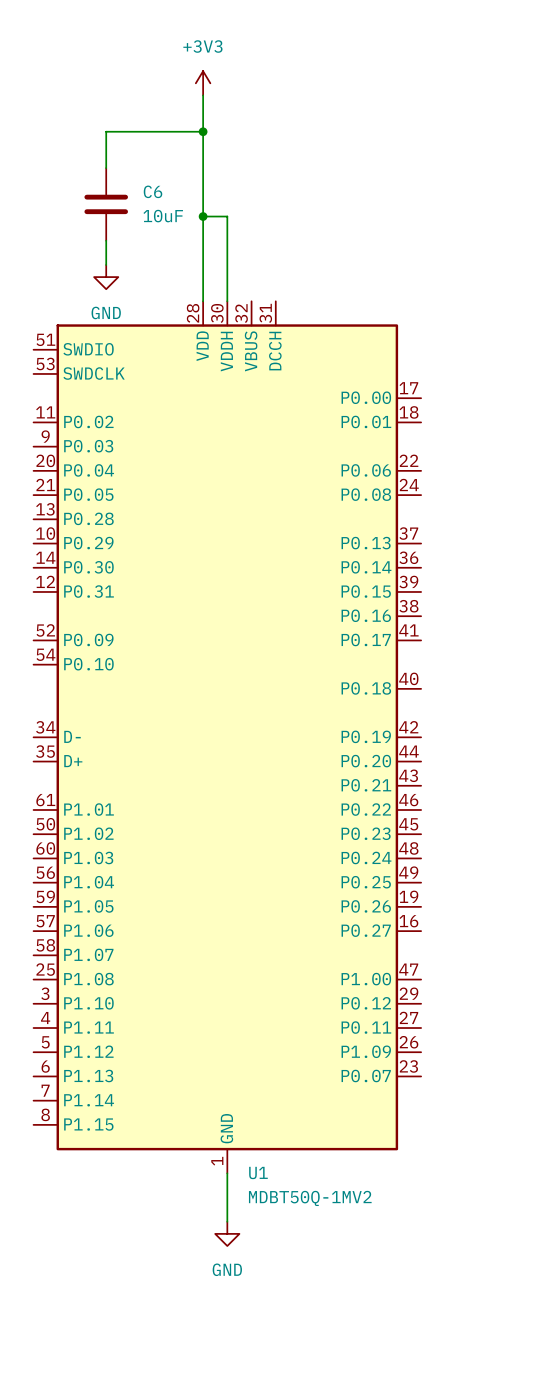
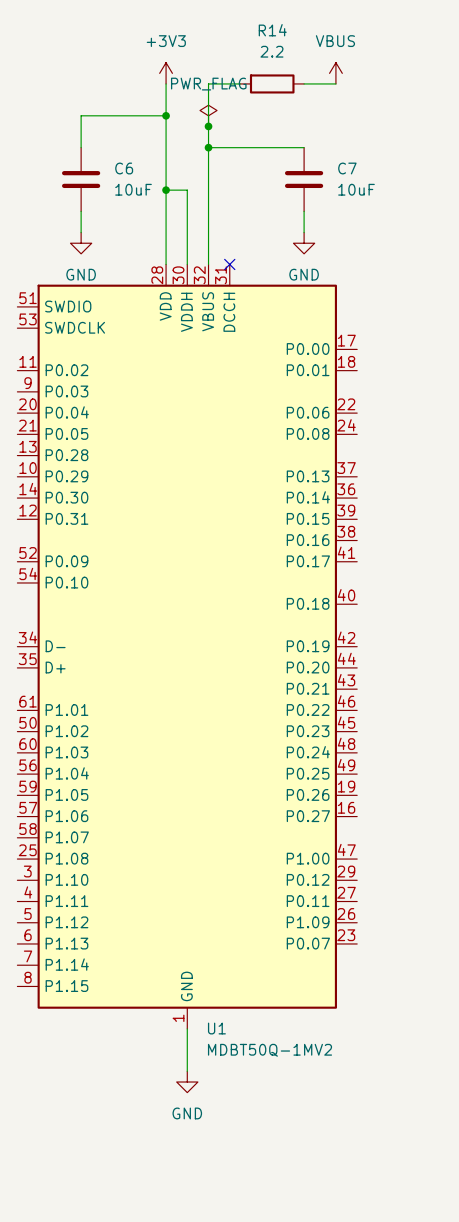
power symbol: none -> VBUS (335, 73)
wire: none -> (240, 83) (208, 83) (208, 264)
R14: none -> 2.2 (272, 83)
wire: none -> (304, 83) (335, 83)
power symbol: none -> PWR_FLAG (208, 115)
junction: none -> (208, 126)
wire: none -> (208, 147) (304, 147)
junction: none -> (208, 147)
C7: none -> 10uF (304, 179)
wire: none -> (304, 211) (304, 232)
power symbol: none -> GND (304, 243)
no-connect mark: none -> (229, 264)

